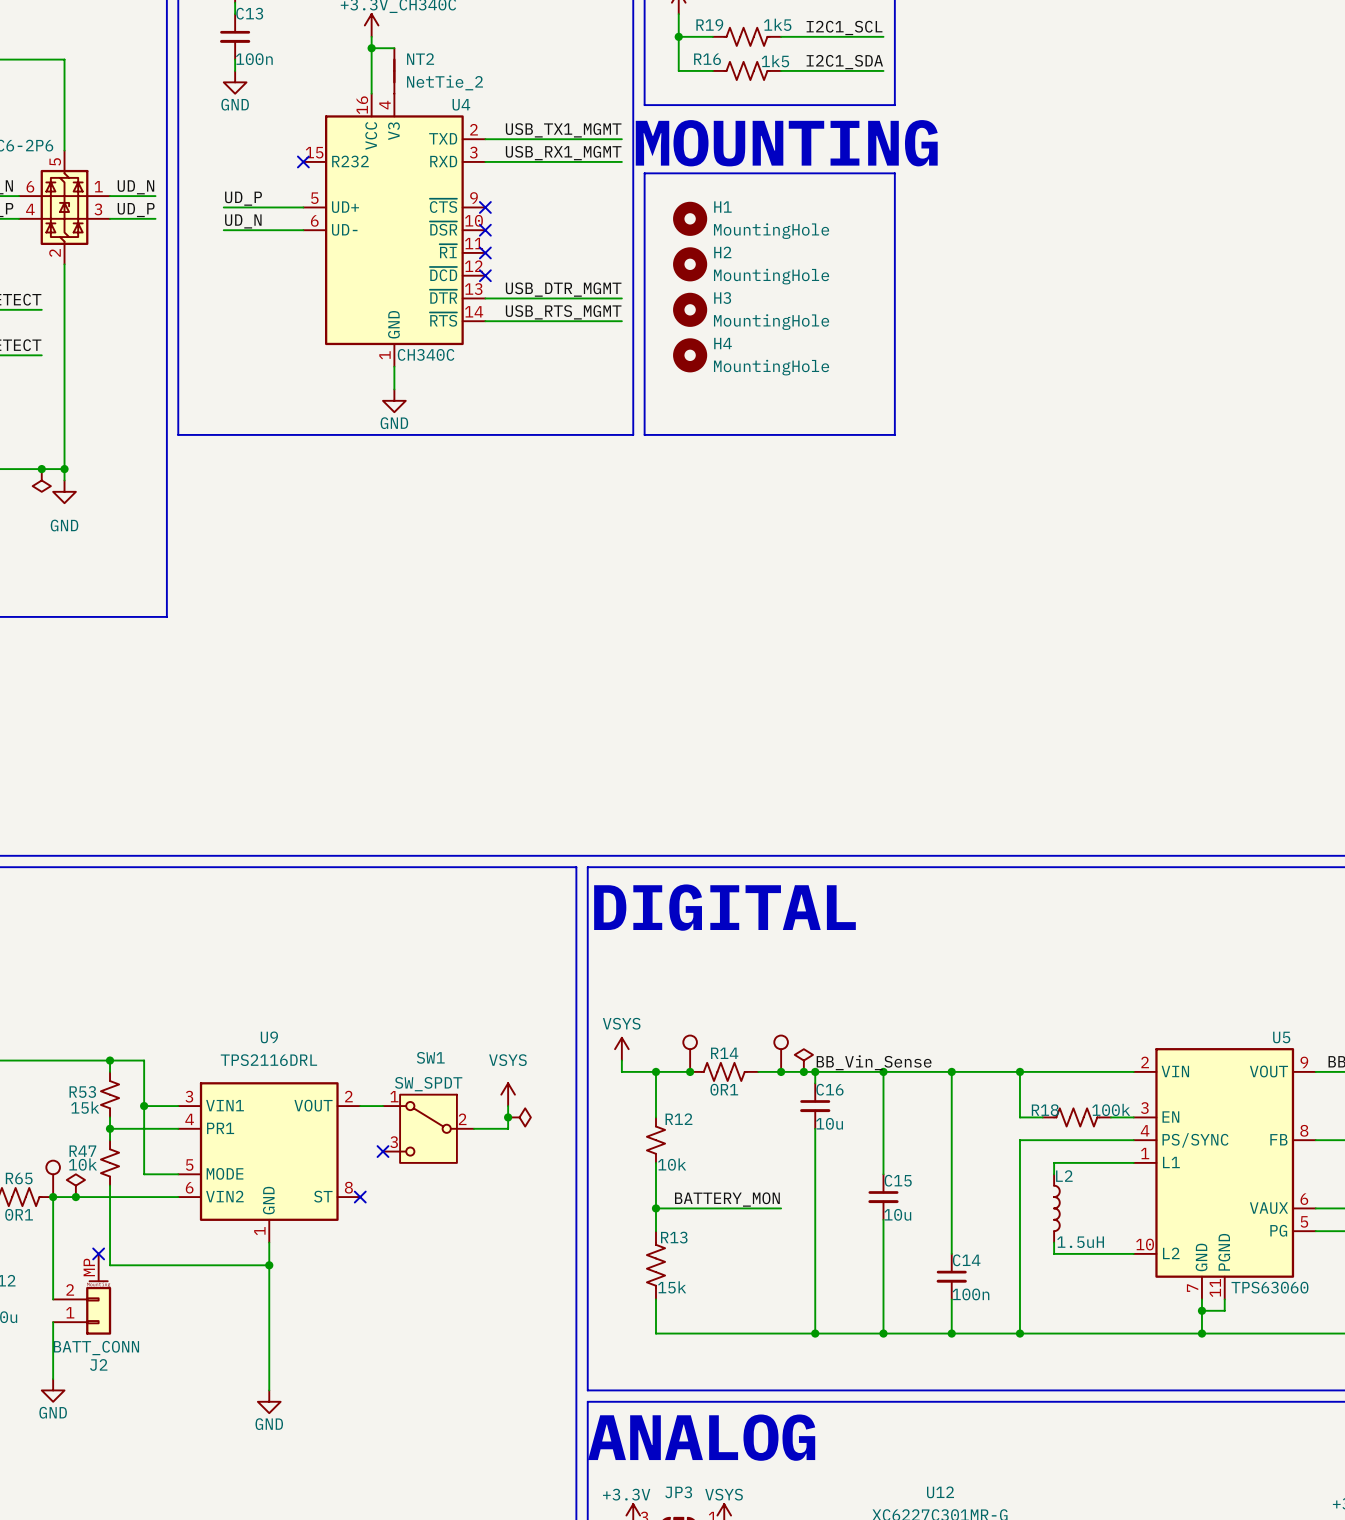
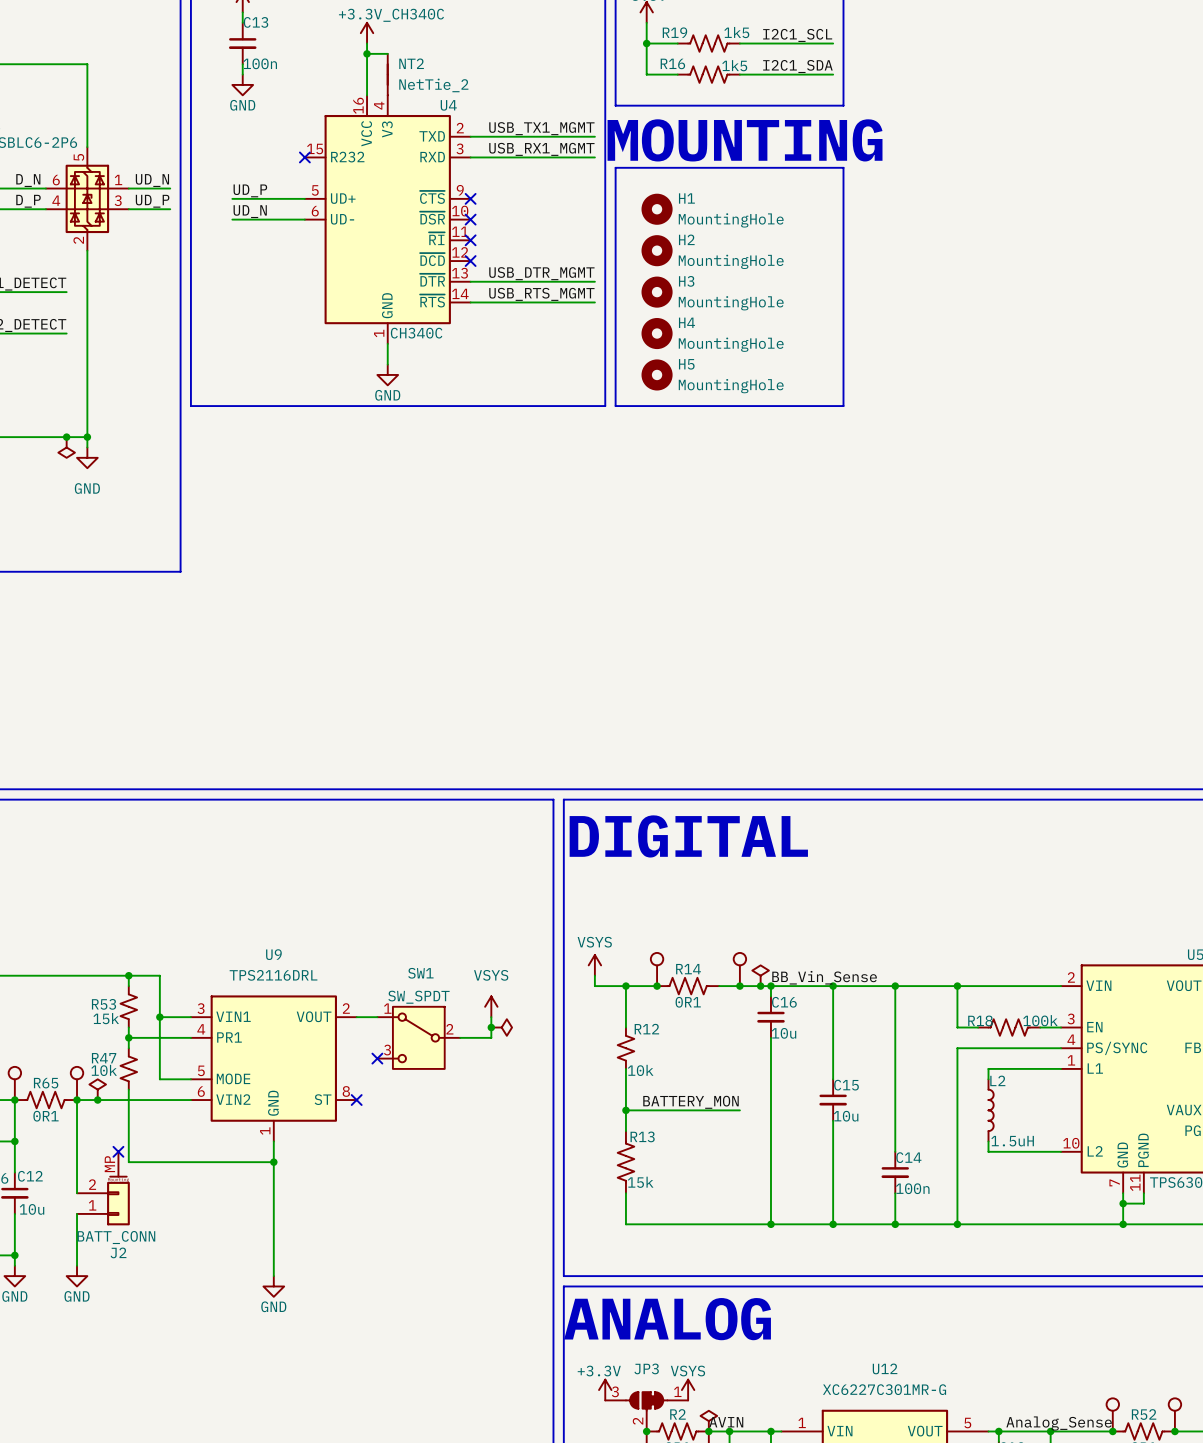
H5: none -> MountingHole (657, 374)

